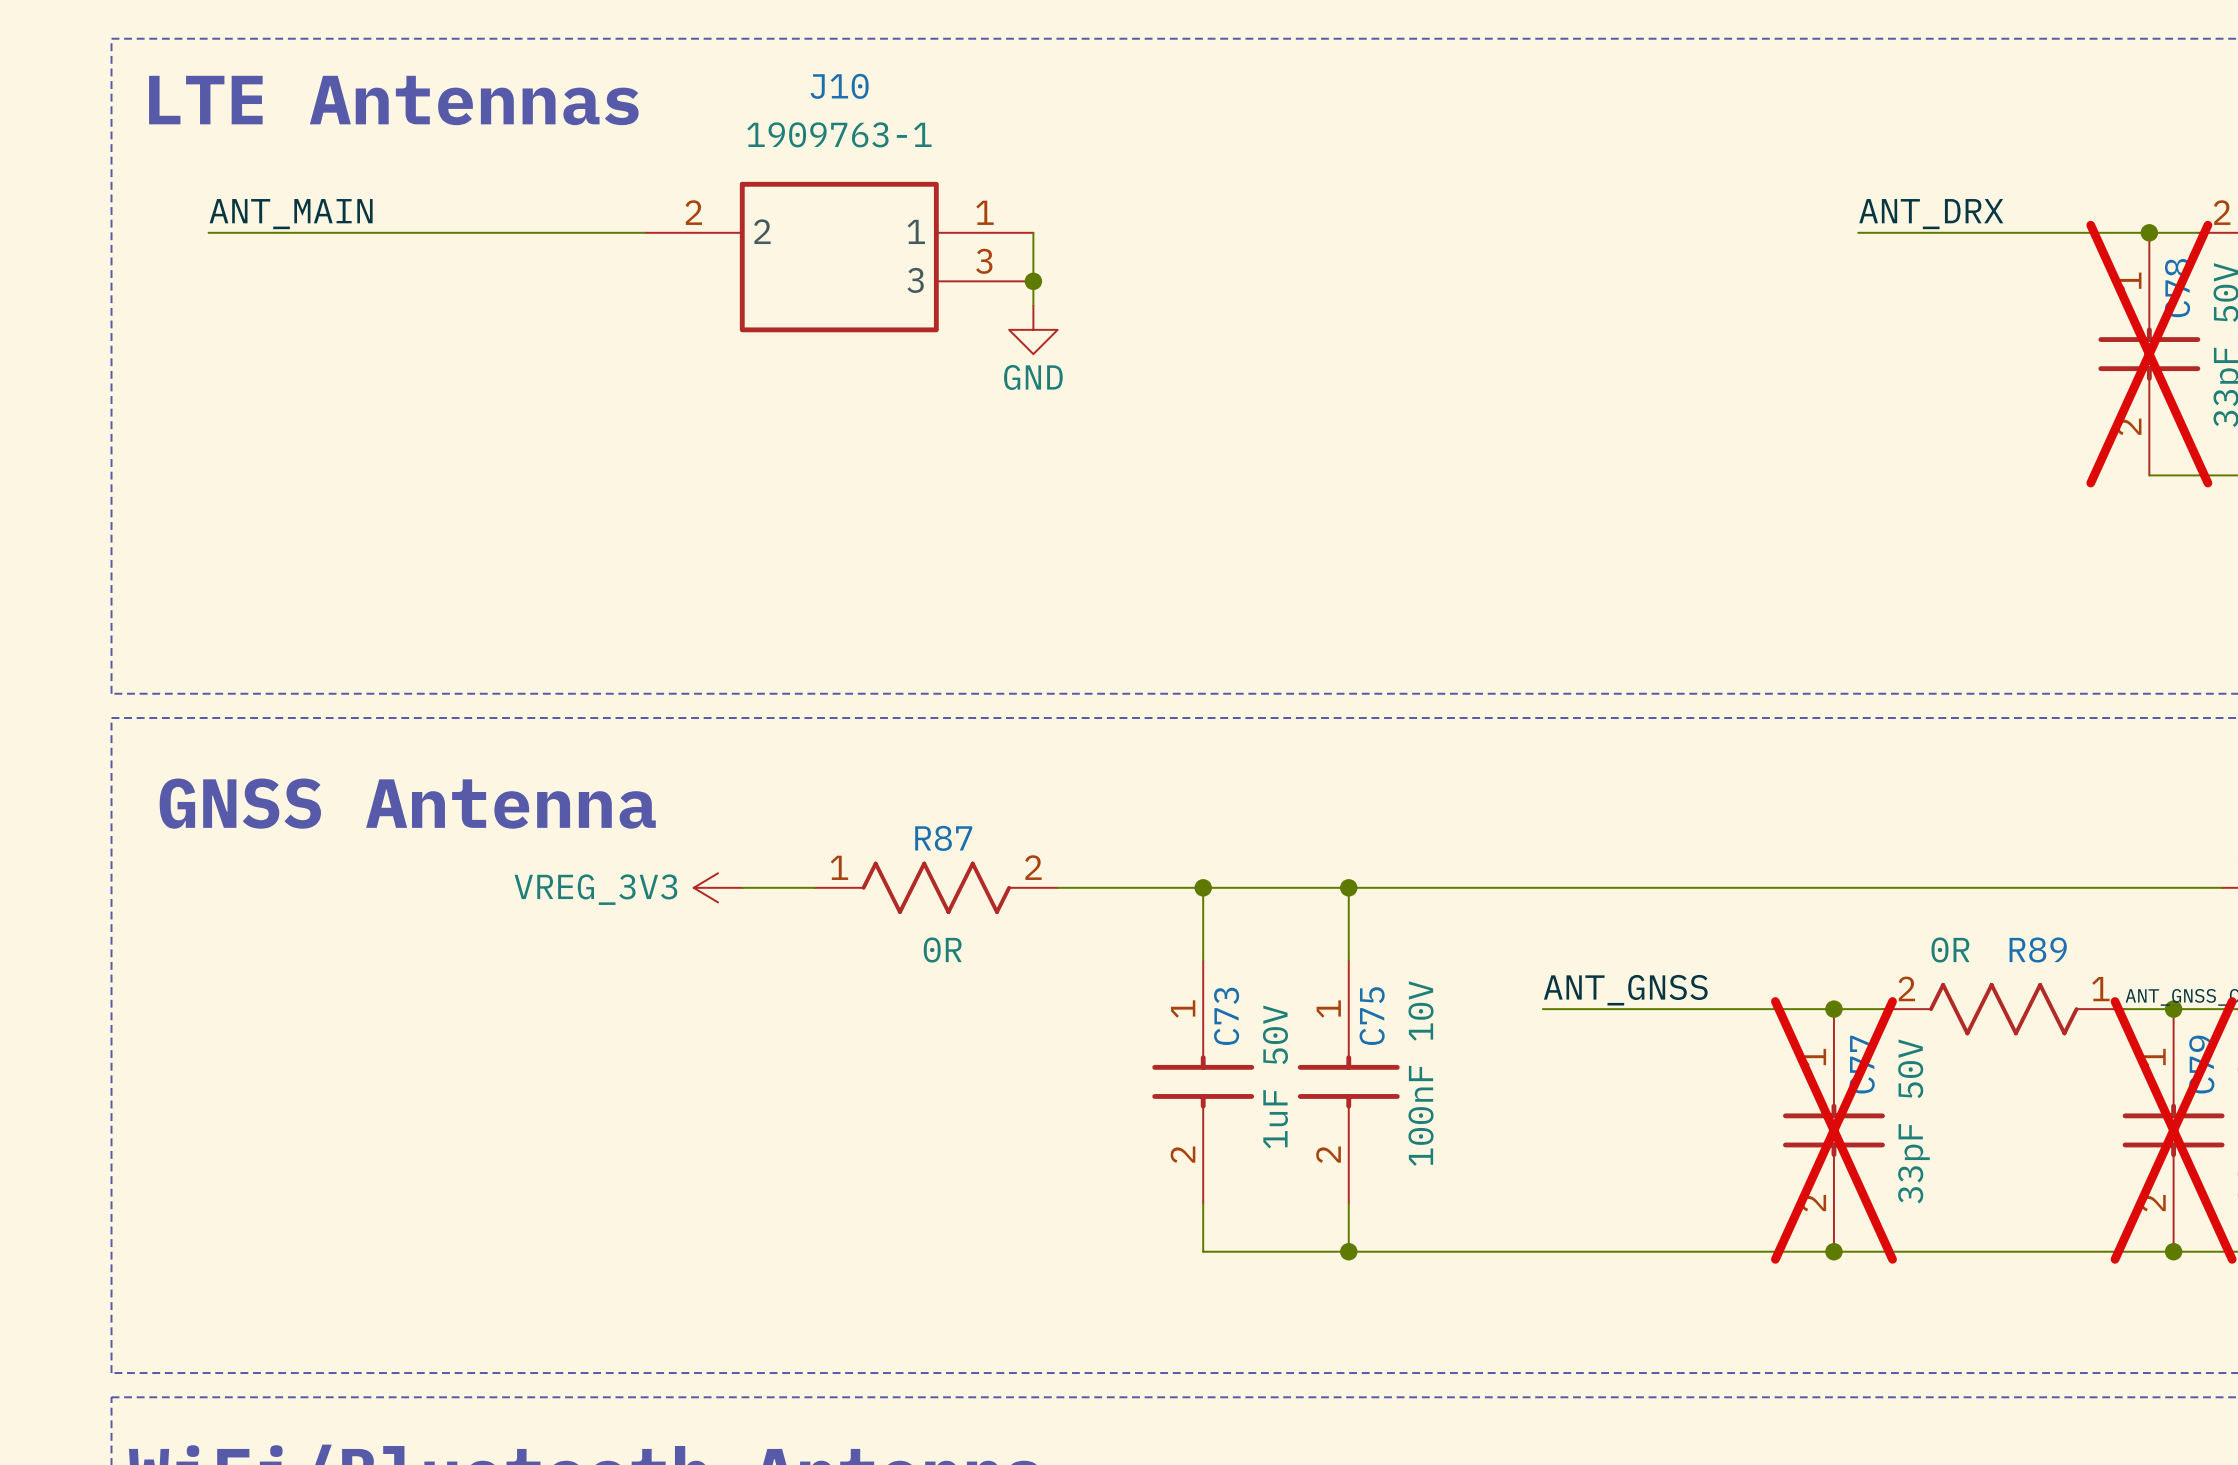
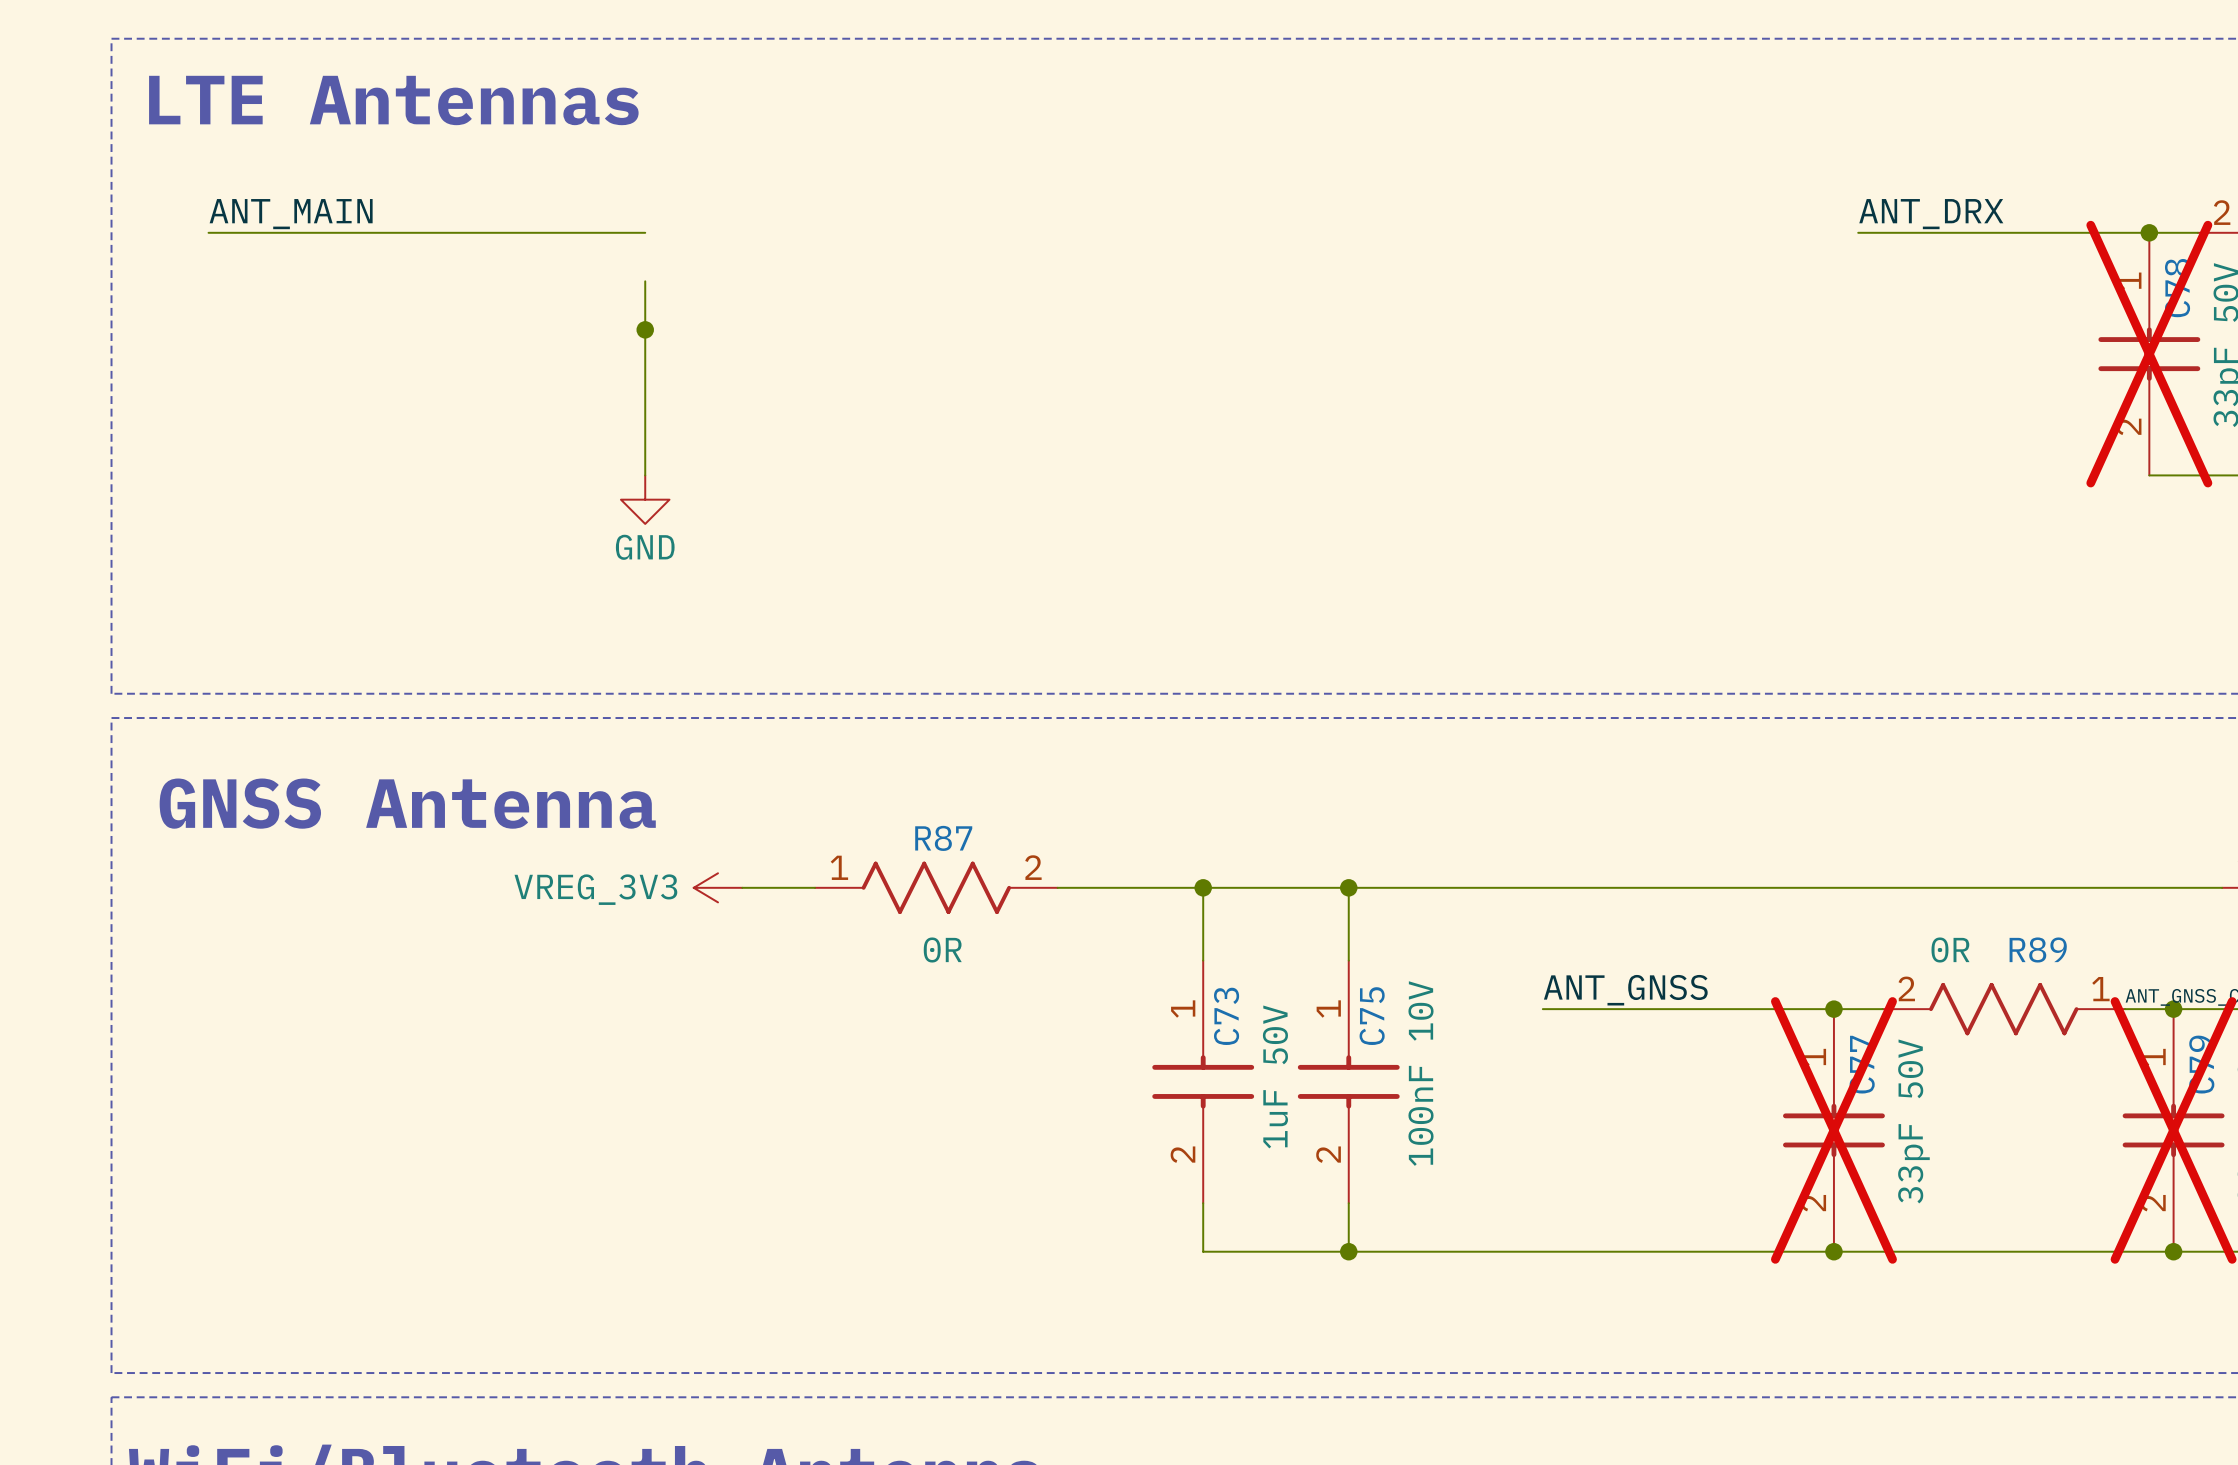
wire: (1033, 232) (1033, 305) -> none
J10: 1909763-1 (839, 257) -> none
wire: none -> (645, 281) (645, 475)
junction: (1033, 281) -> none
junction: none -> (645, 329)
power symbol position: GND (1033, 329) -> GND (645, 499)

